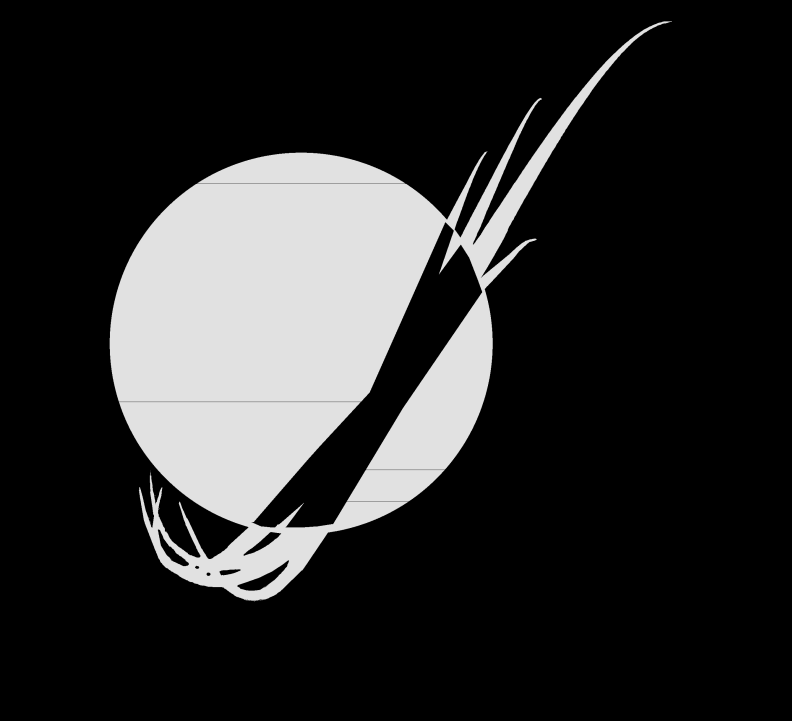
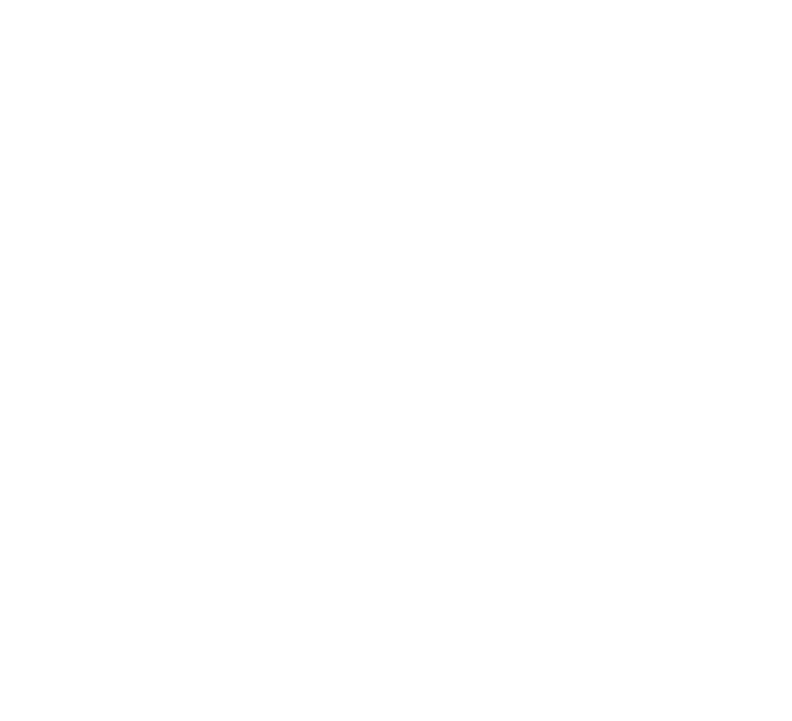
drawing: [109, 21, 672, 602] -> none

